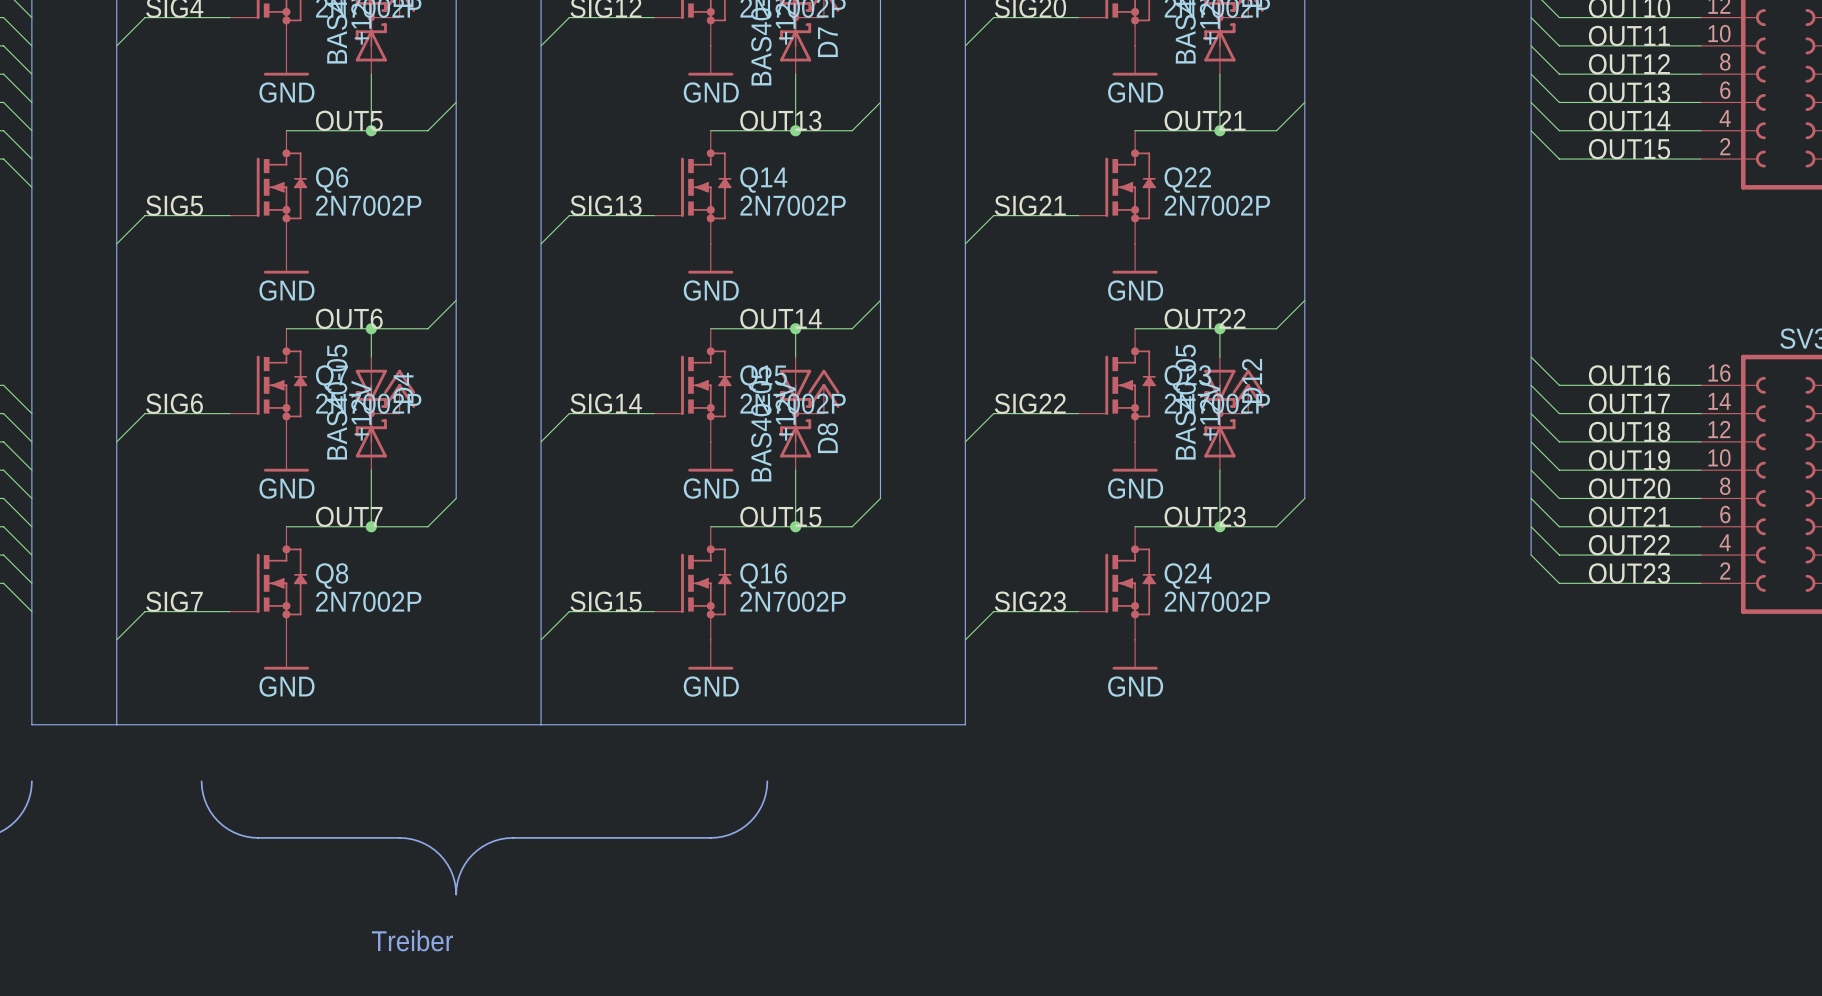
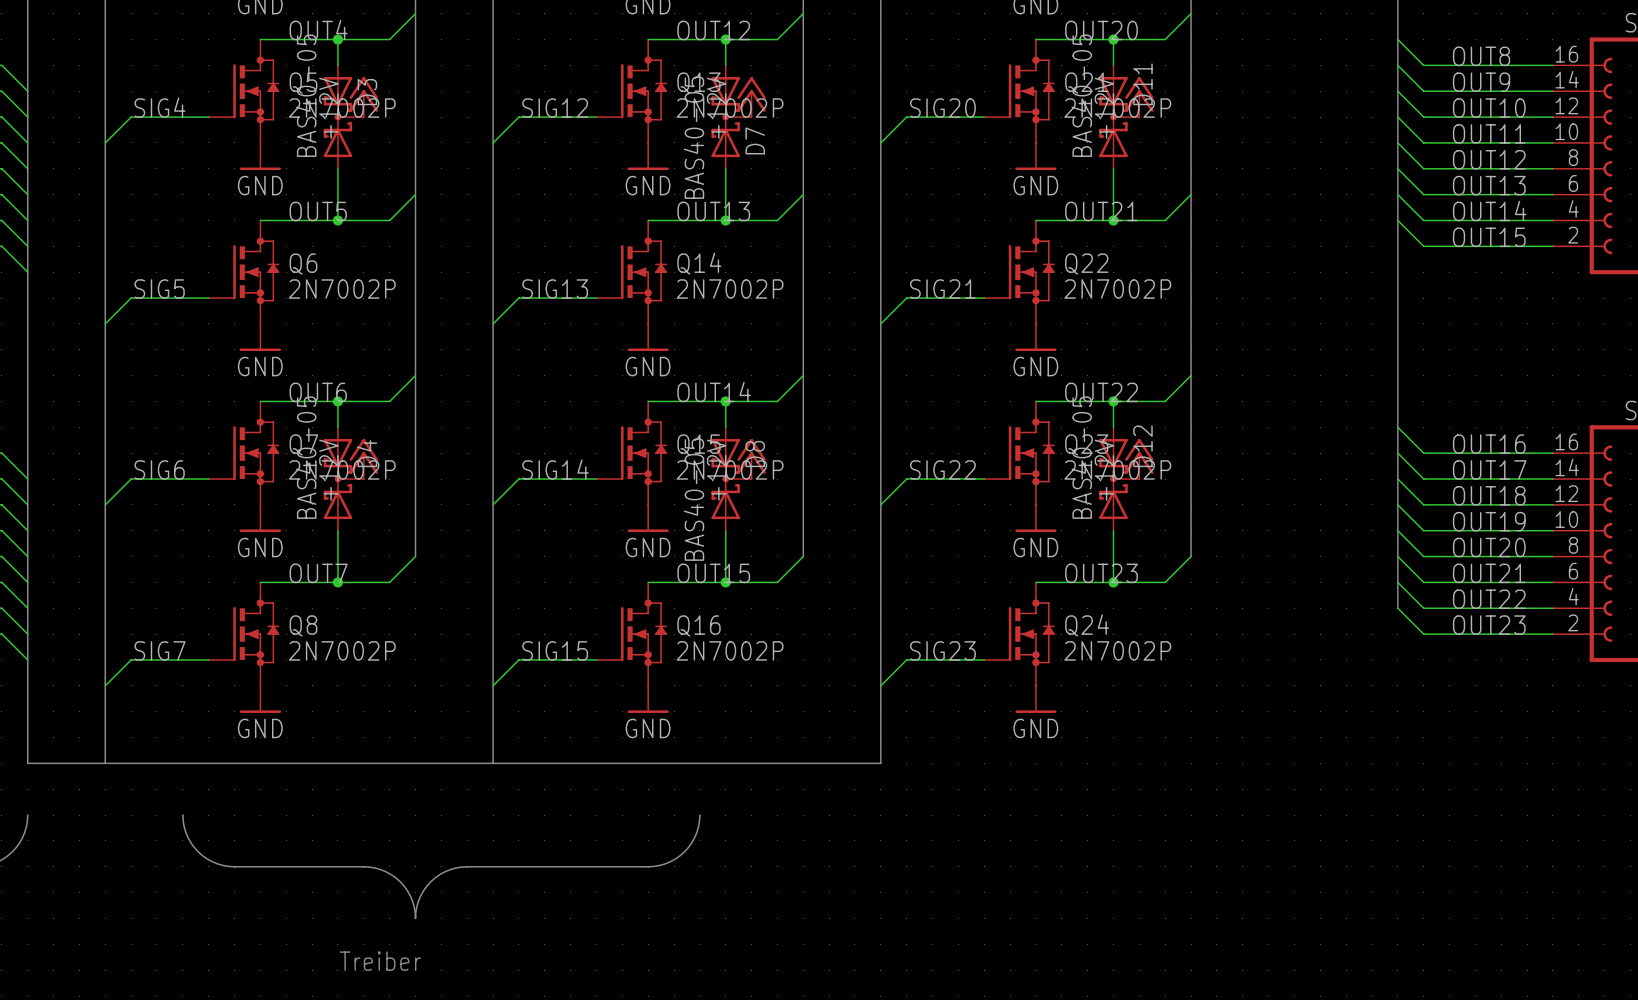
D8 name position: D8 (827, 438) -> D8 (755, 454)

